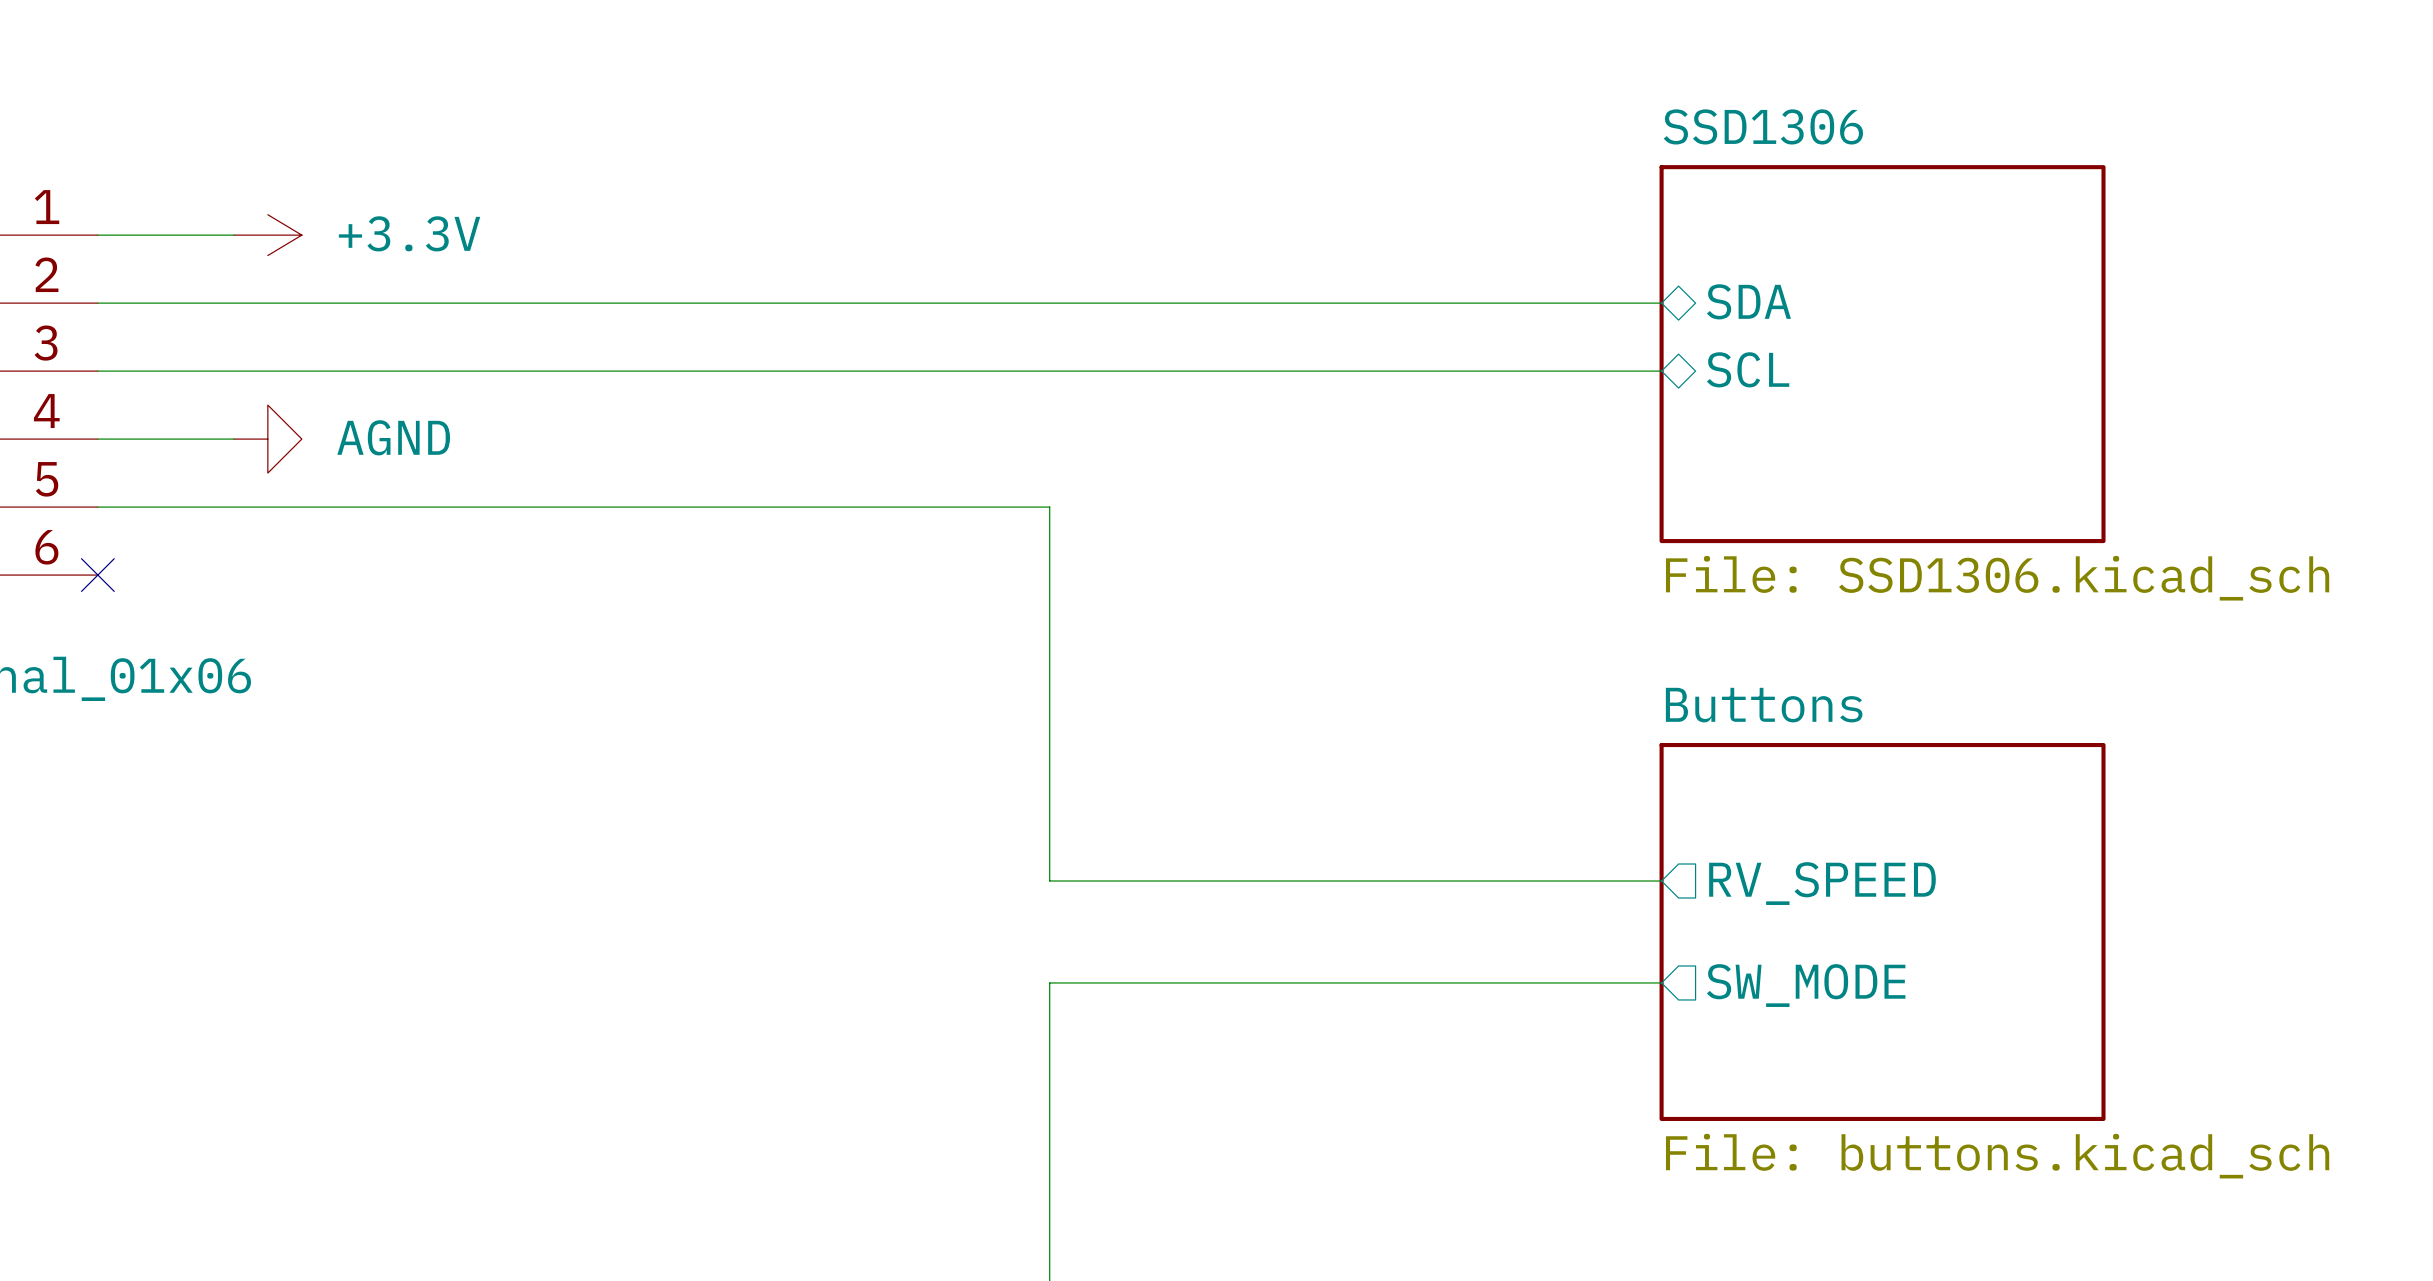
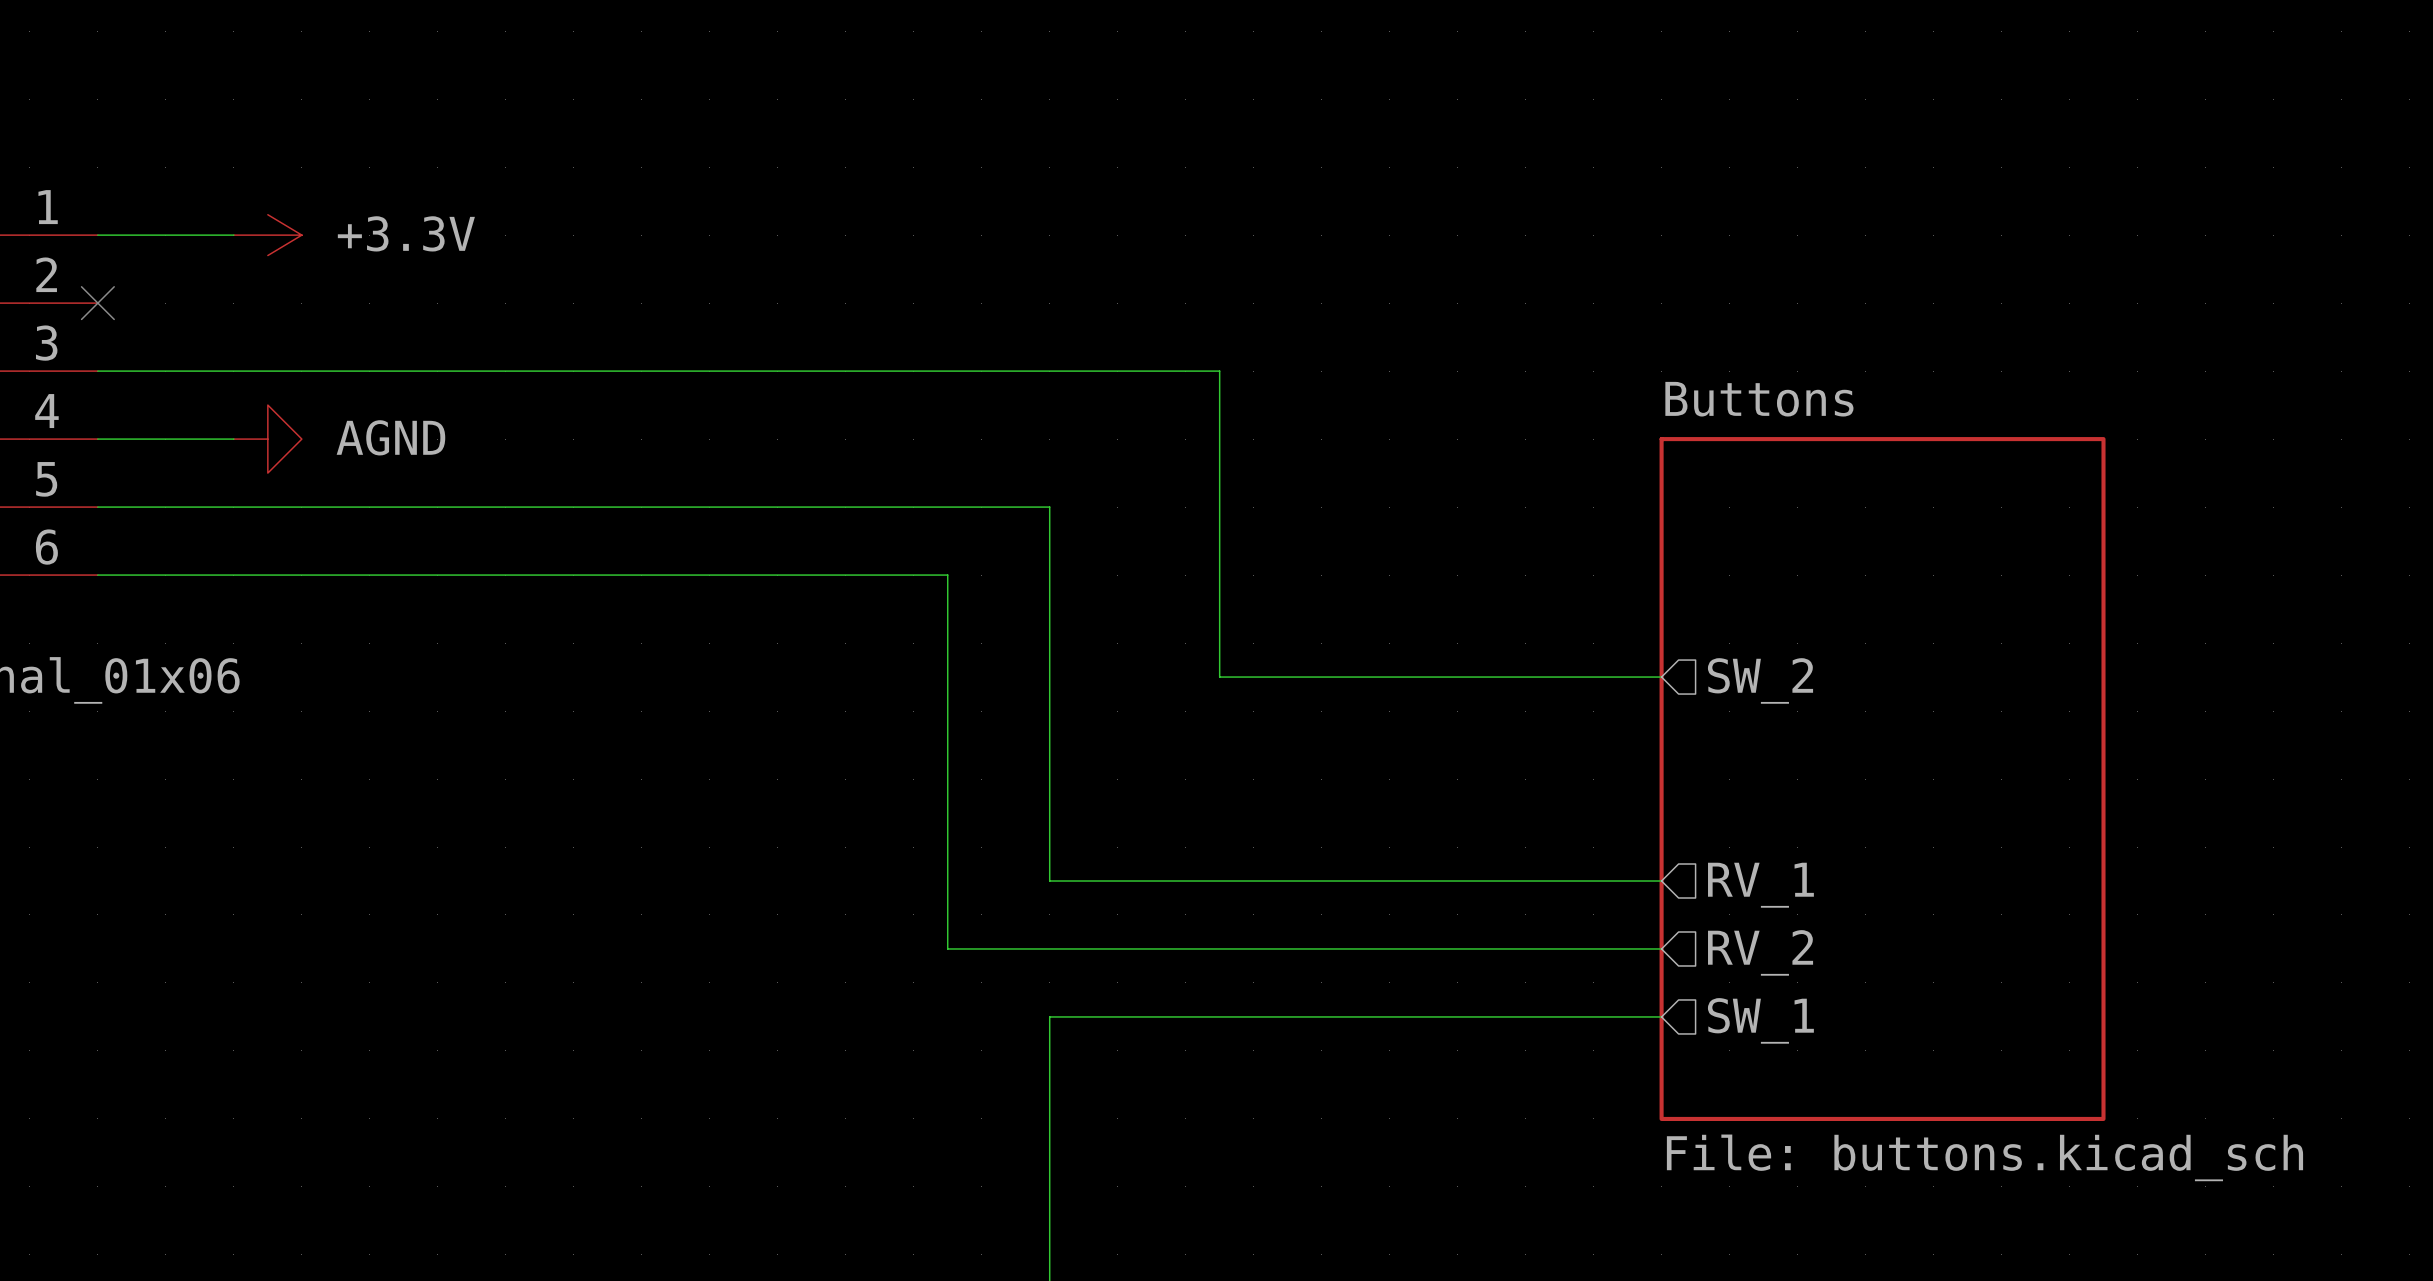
sheet pin: SDA (1748, 301) -> none
wire: (97, 303) (1661, 303) -> none
no-connect mark: none -> (97, 303)
sheet SSD1306: File: SSD1306.kicad_sch (1882, 354) -> none
sheet pin: SCL (1748, 369) -> none
wire: (1219, 371) (1661, 371) -> (1219, 371) (1219, 677) (1661, 677)
wire: none -> (97, 575) (947, 575) (947, 948) (1661, 948)
no-connect mark: (97, 575) -> none
sheet pin: none -> SW_2 (1760, 680)
sheet Buttons: none -> File: buttons.kicad_sch (1882, 779)
sheet pin: RV_SPEED (1822, 883) -> RV_1 (1760, 885)
sheet Buttons: File: buttons.kicad_sch (1882, 931) -> none
sheet pin: none -> RV_2 (1760, 952)
wire: (1661, 982) (1049, 982) (1049, 1016) -> (1661, 1016) (1049, 1016)
sheet pin: SW_MODE (1806, 985) -> none
sheet pin: none -> SW_1 (1760, 1020)

